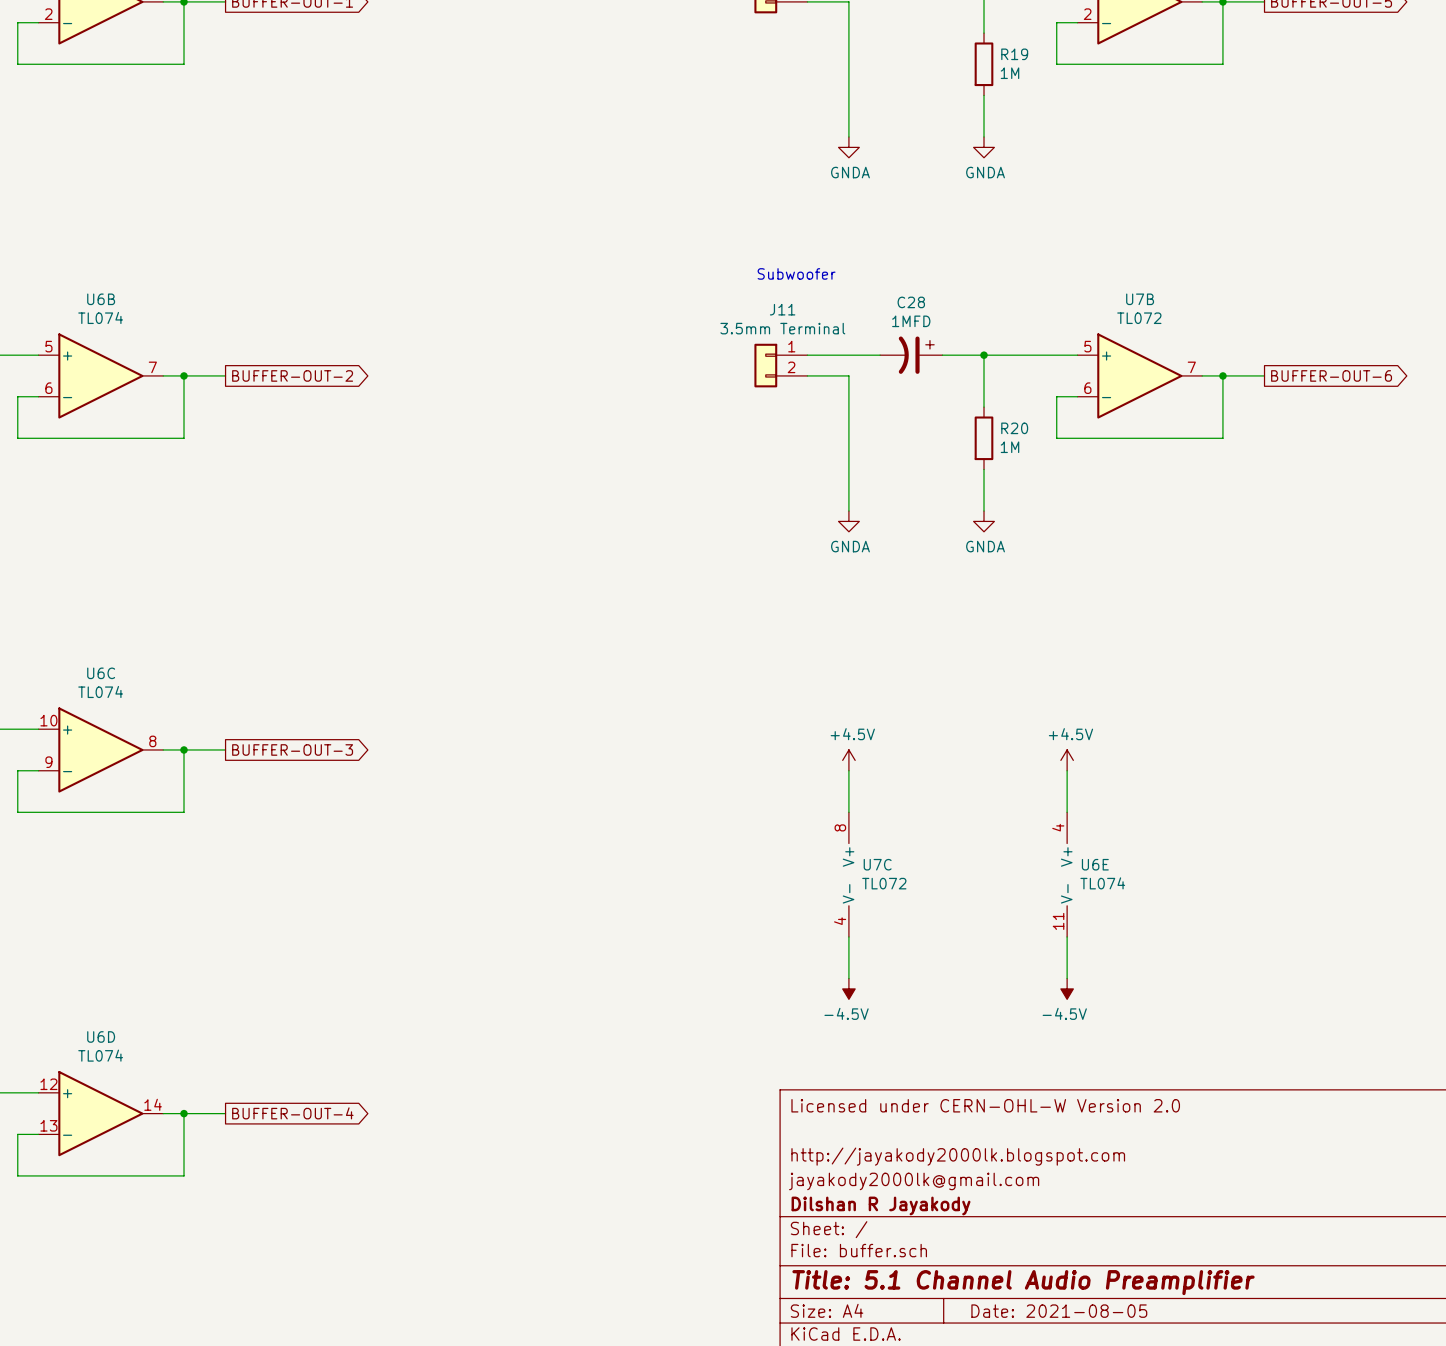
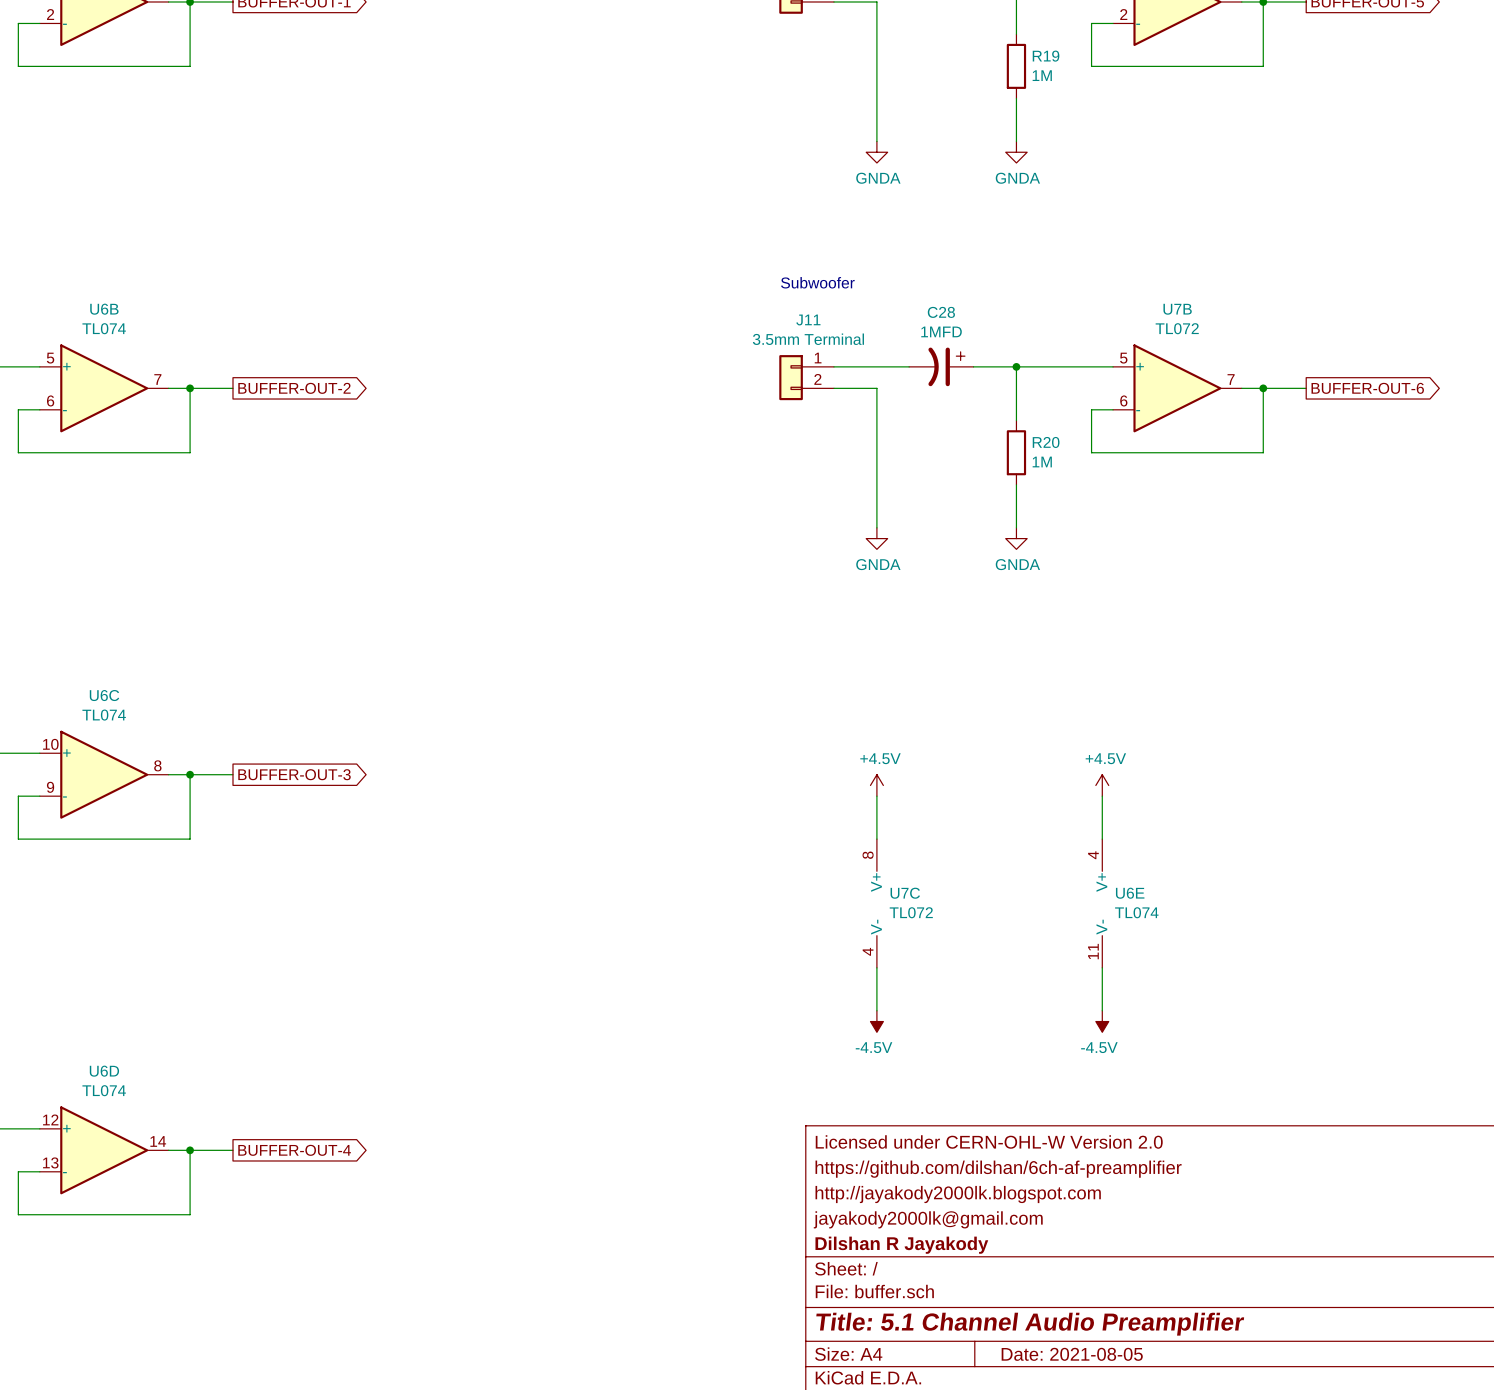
title block: none -> https://github.com/dilshan/6ch-af-preamplifier (998, 1169)

